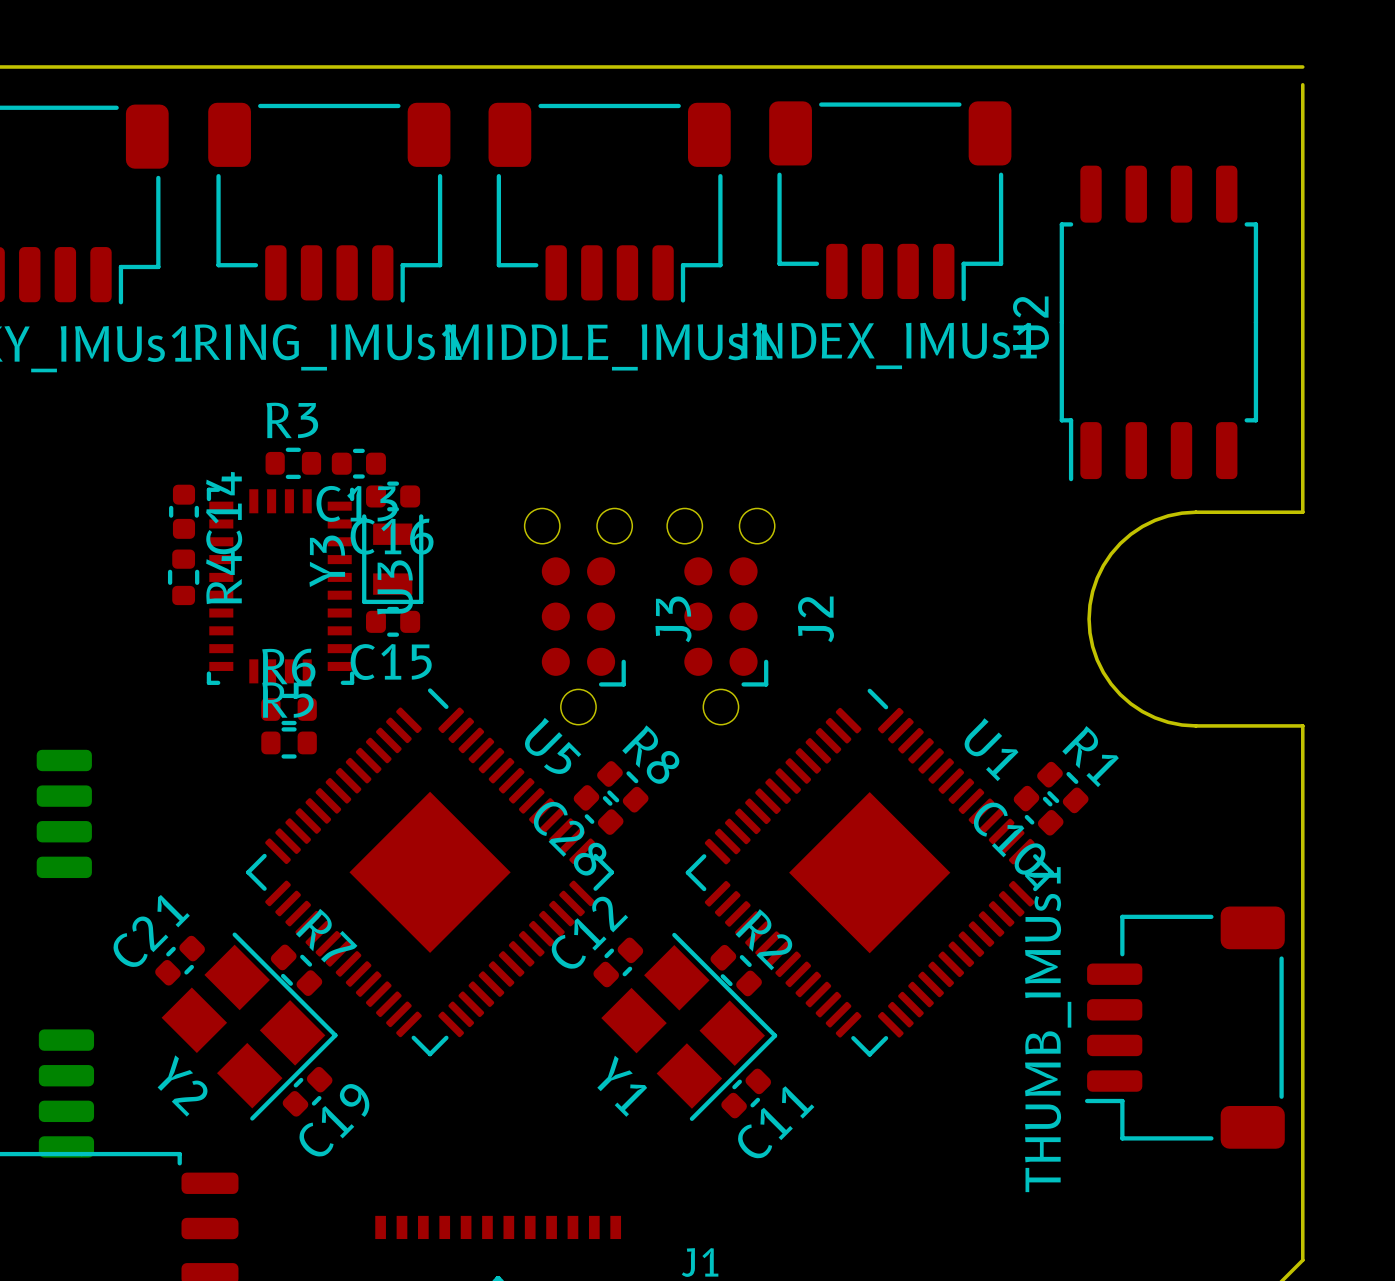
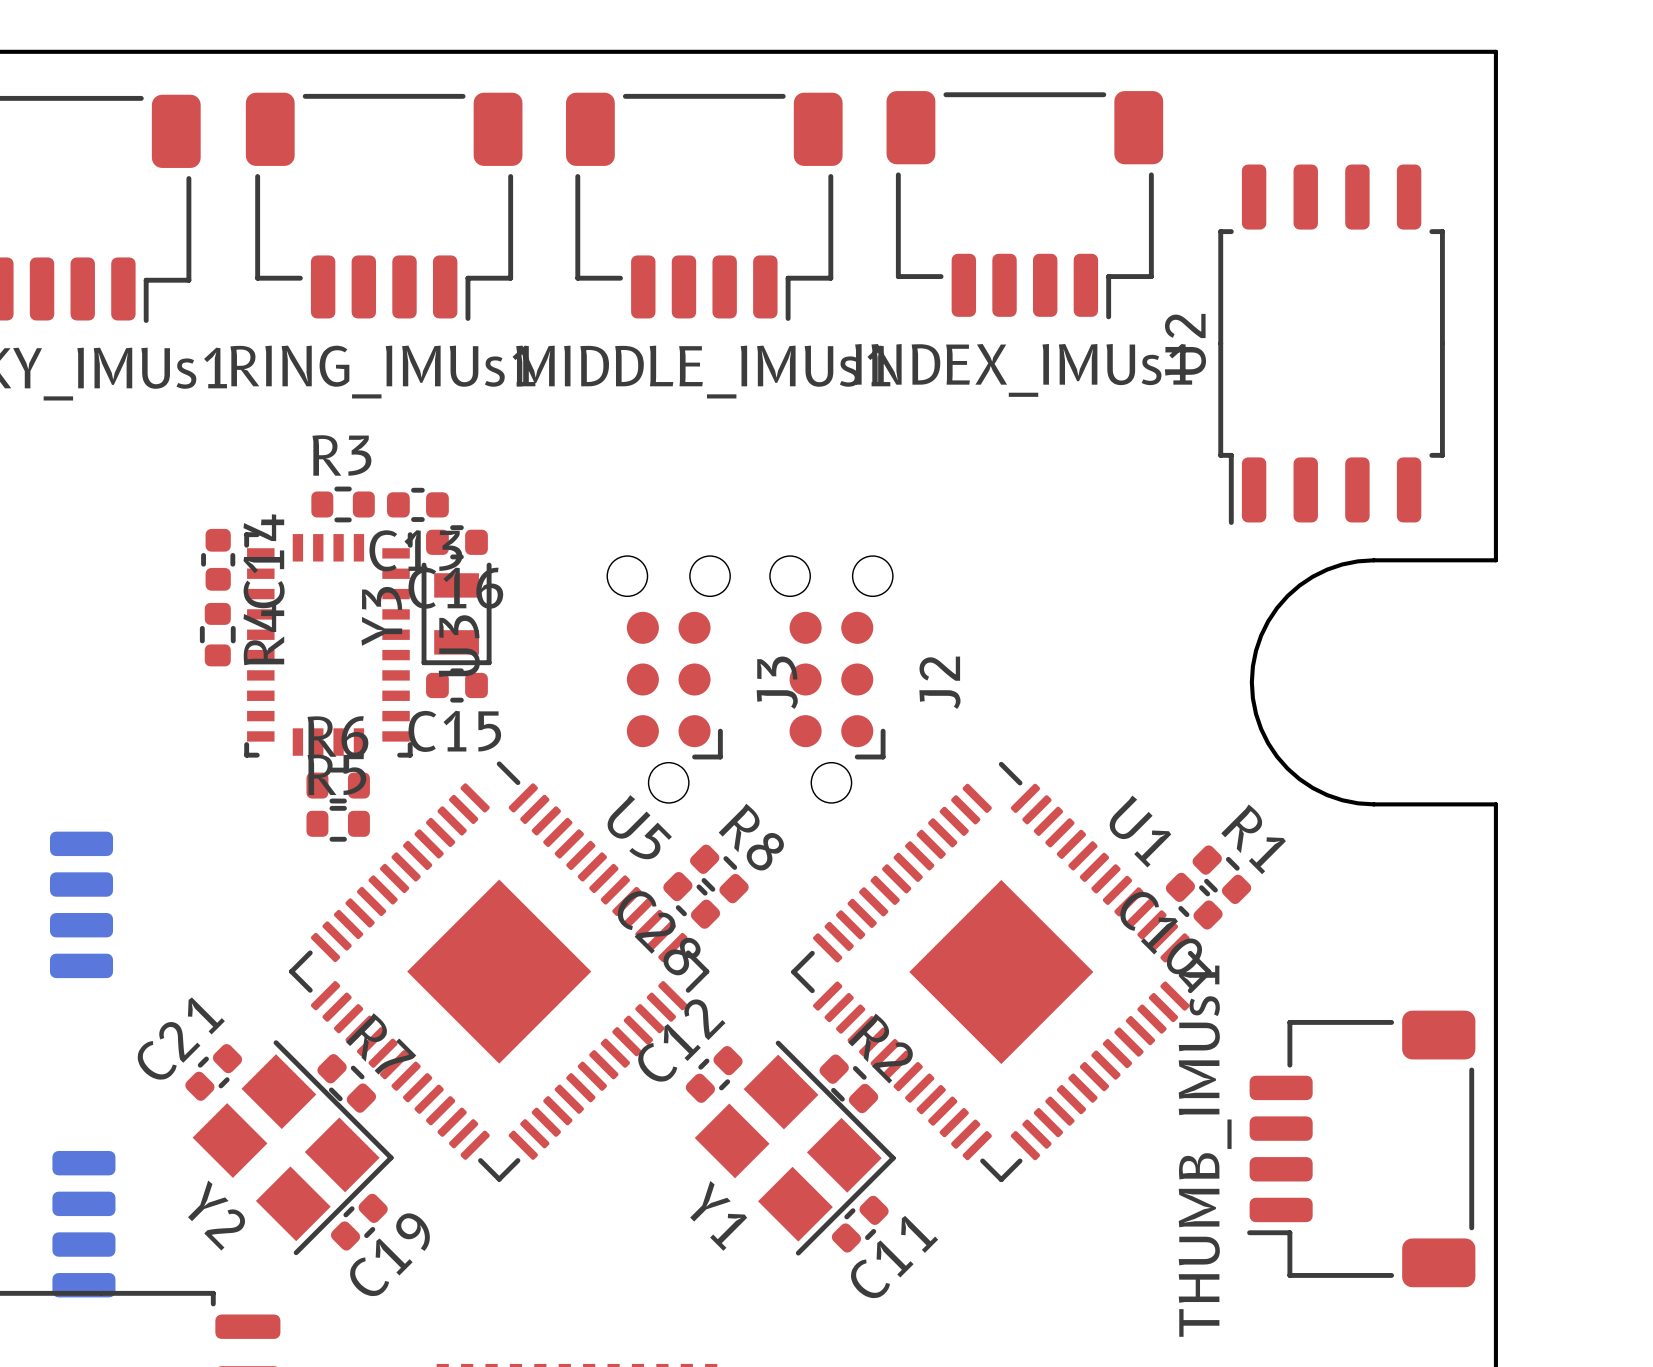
board edge: none -> (1495, 51) (1495, 72)

